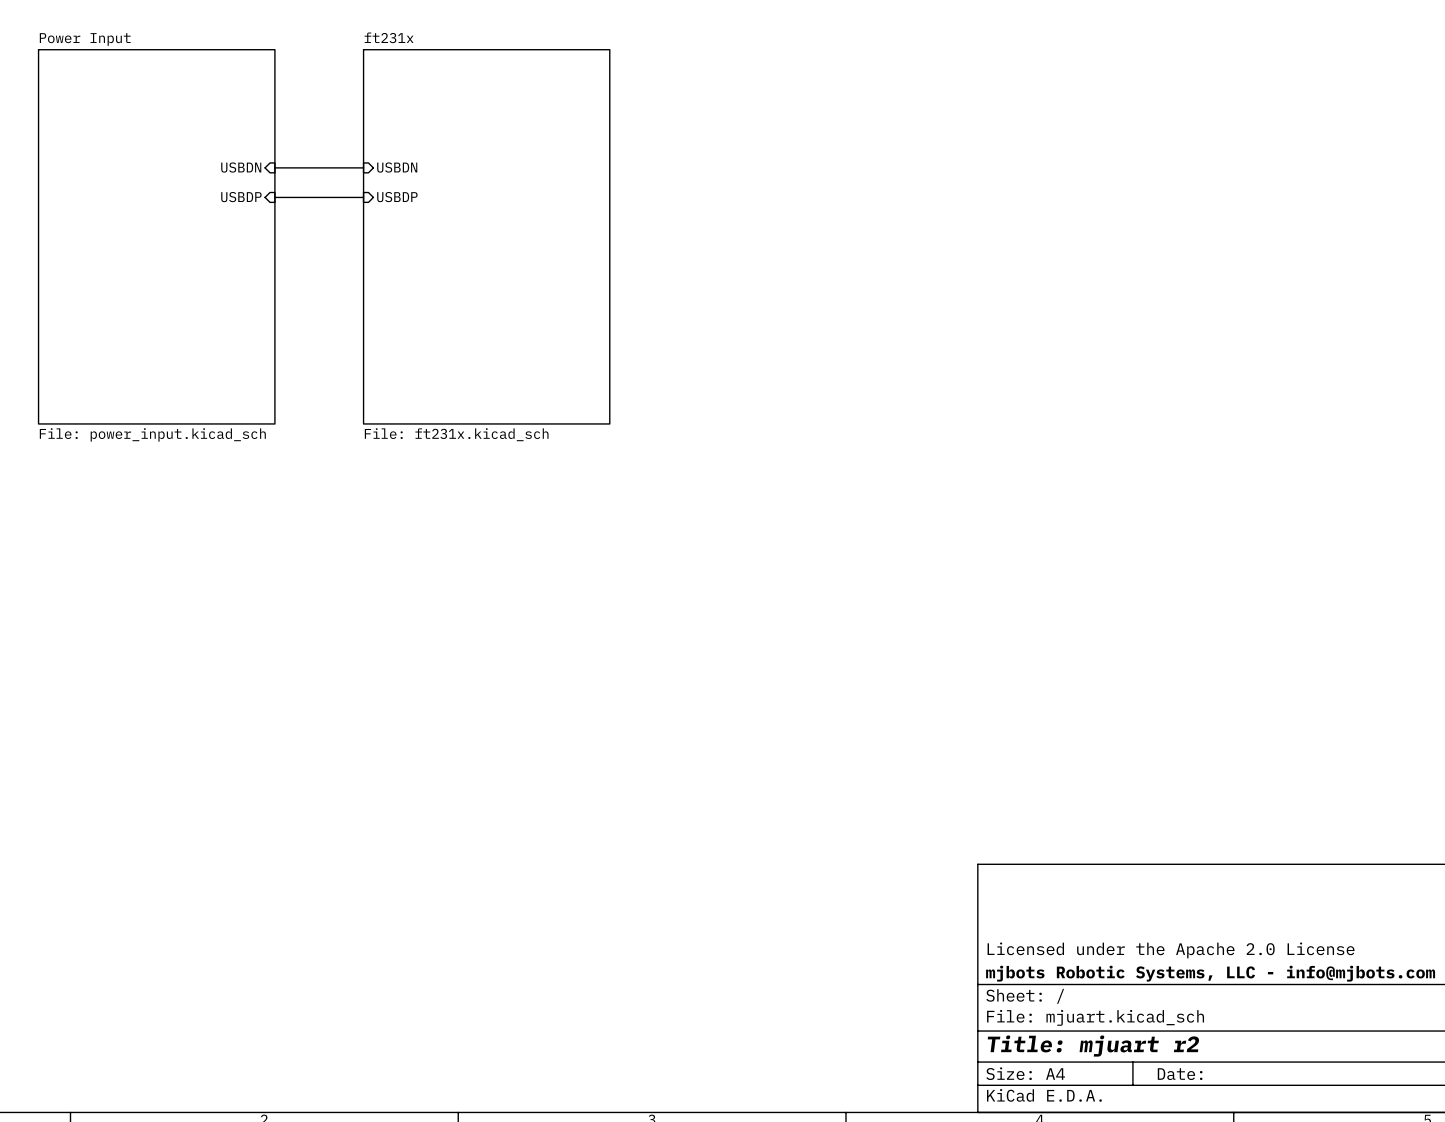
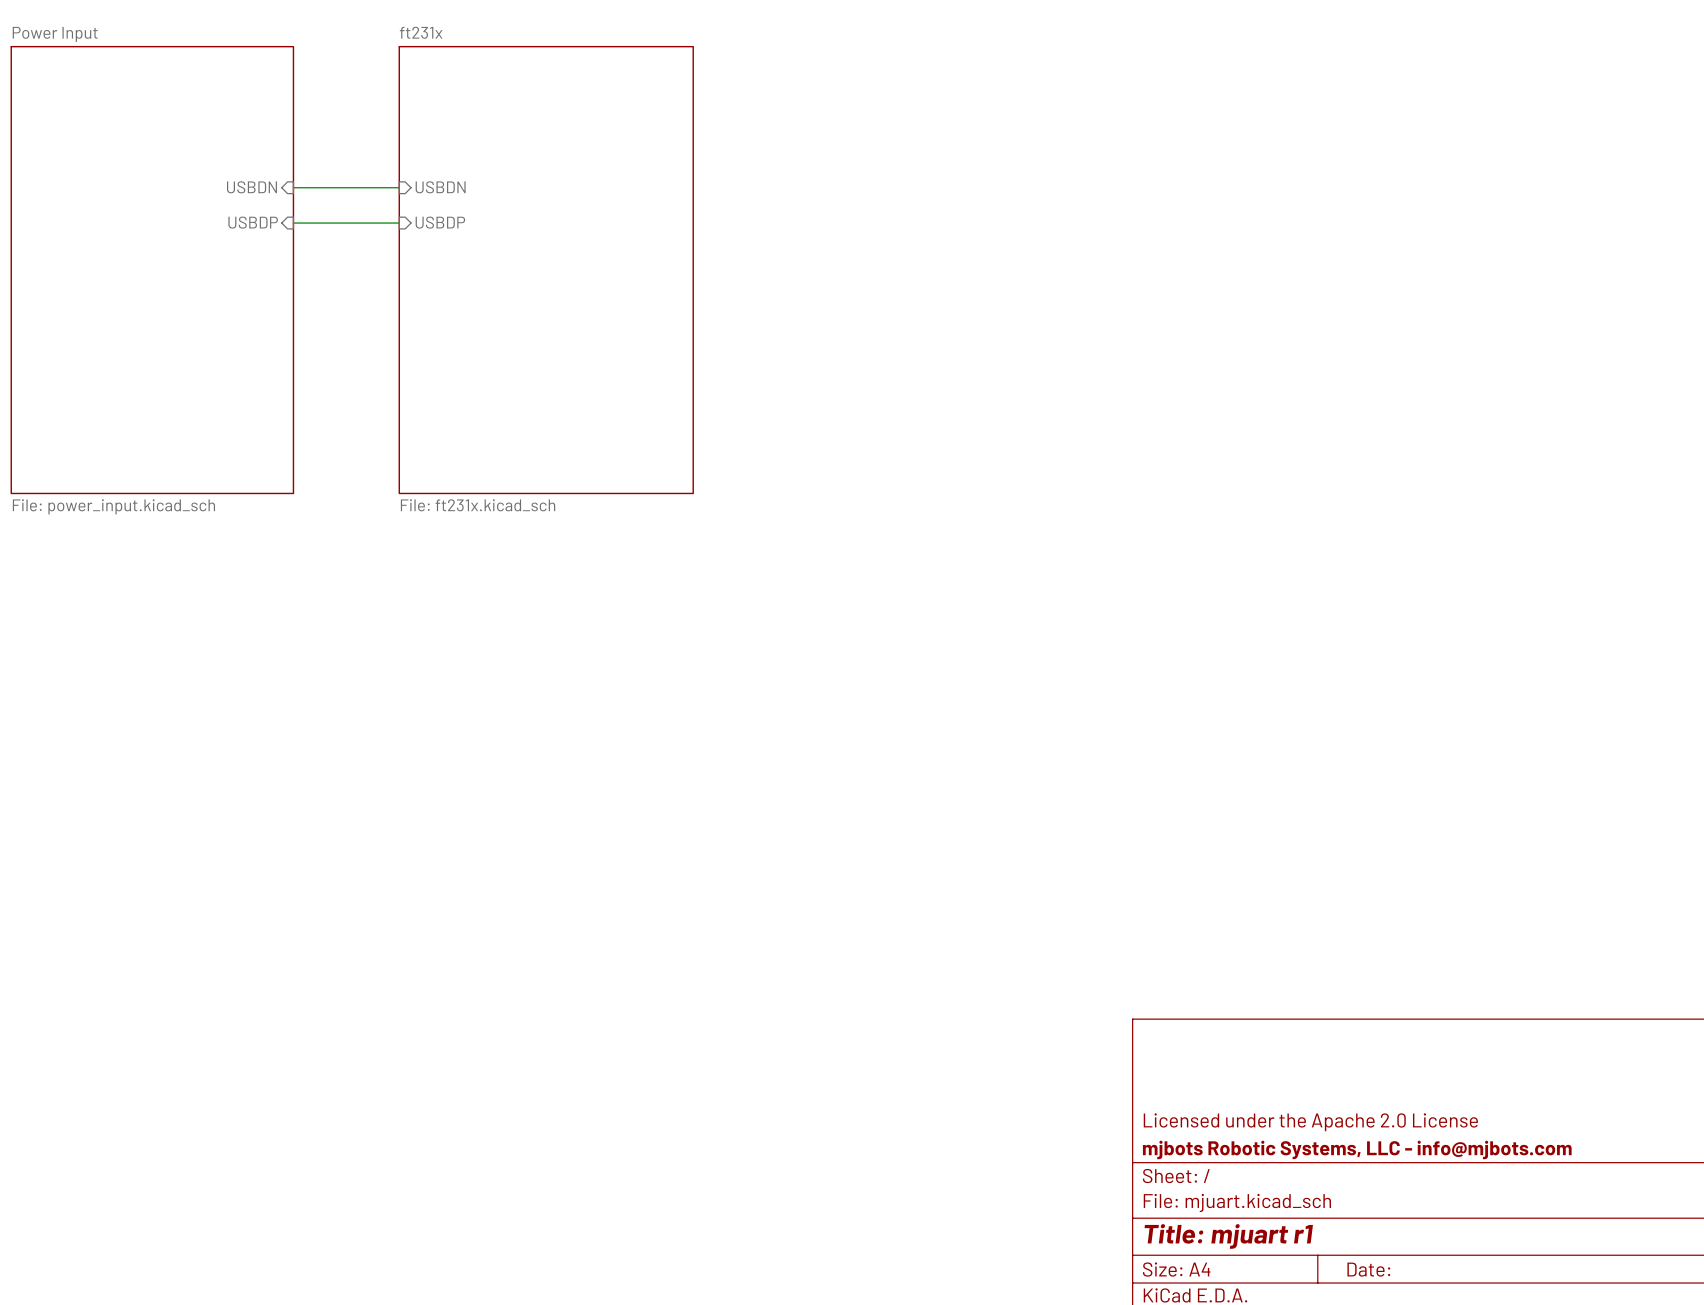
title block: Title: mjuart r2 (1093, 1046) -> Title: mjuart r1 (1228, 1236)

